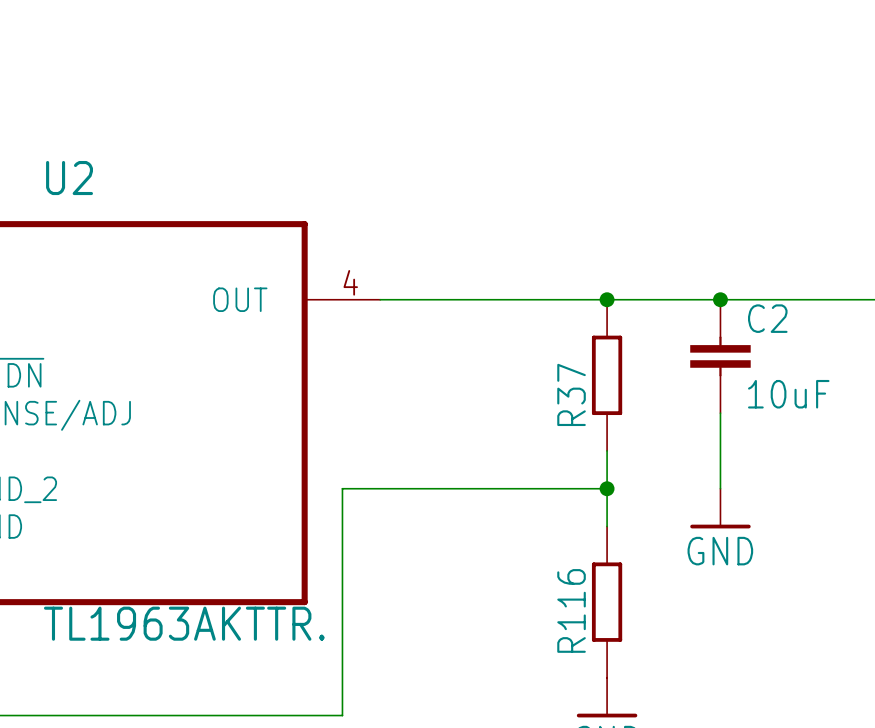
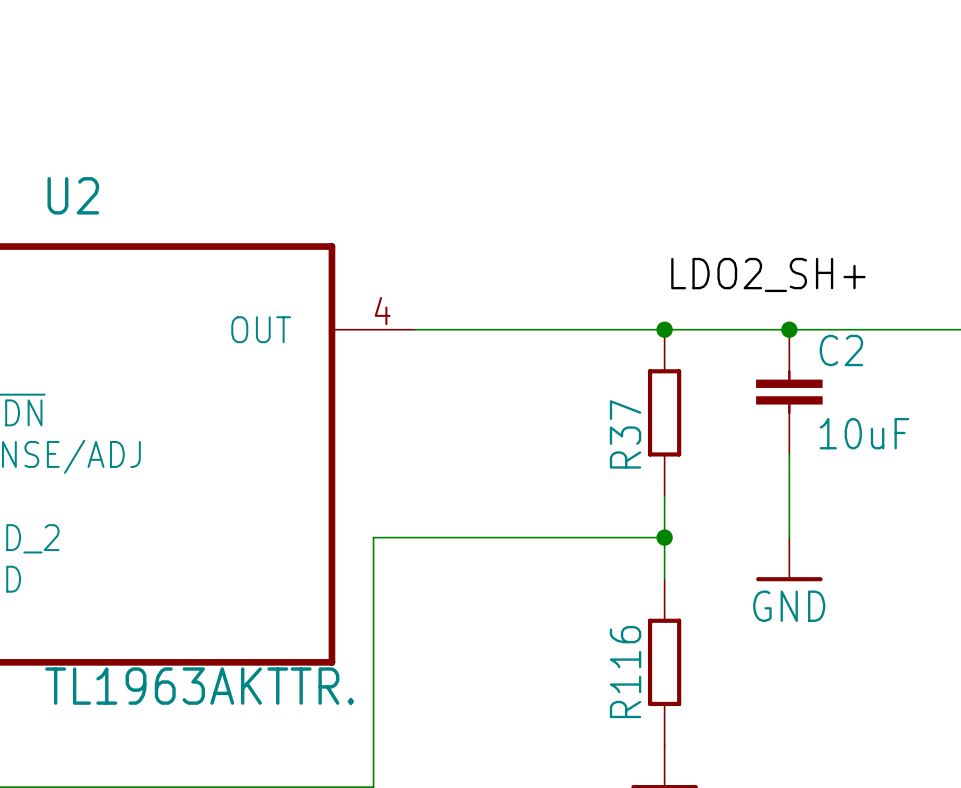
label: none -> LDO2_SH+ (768, 274)

